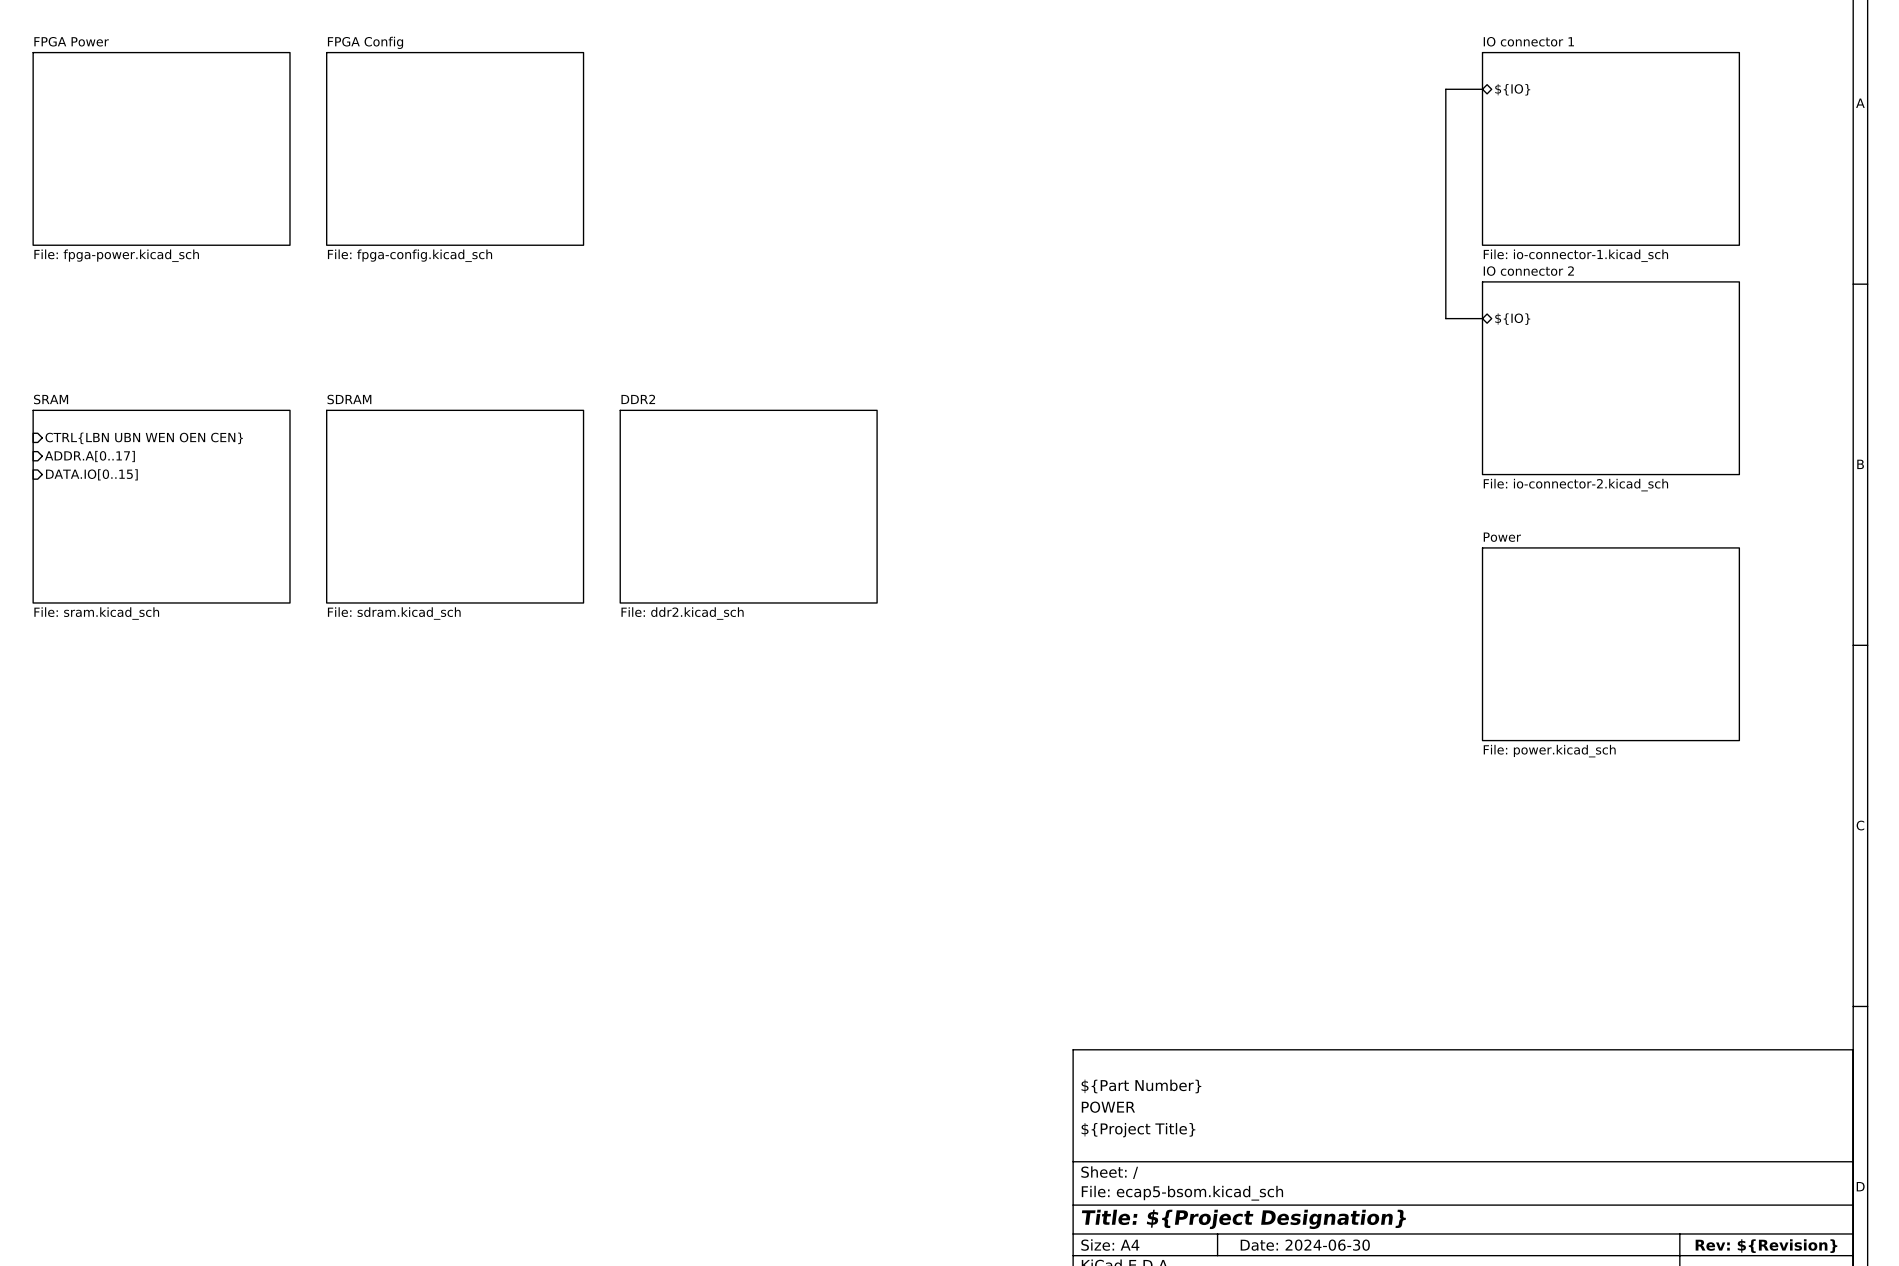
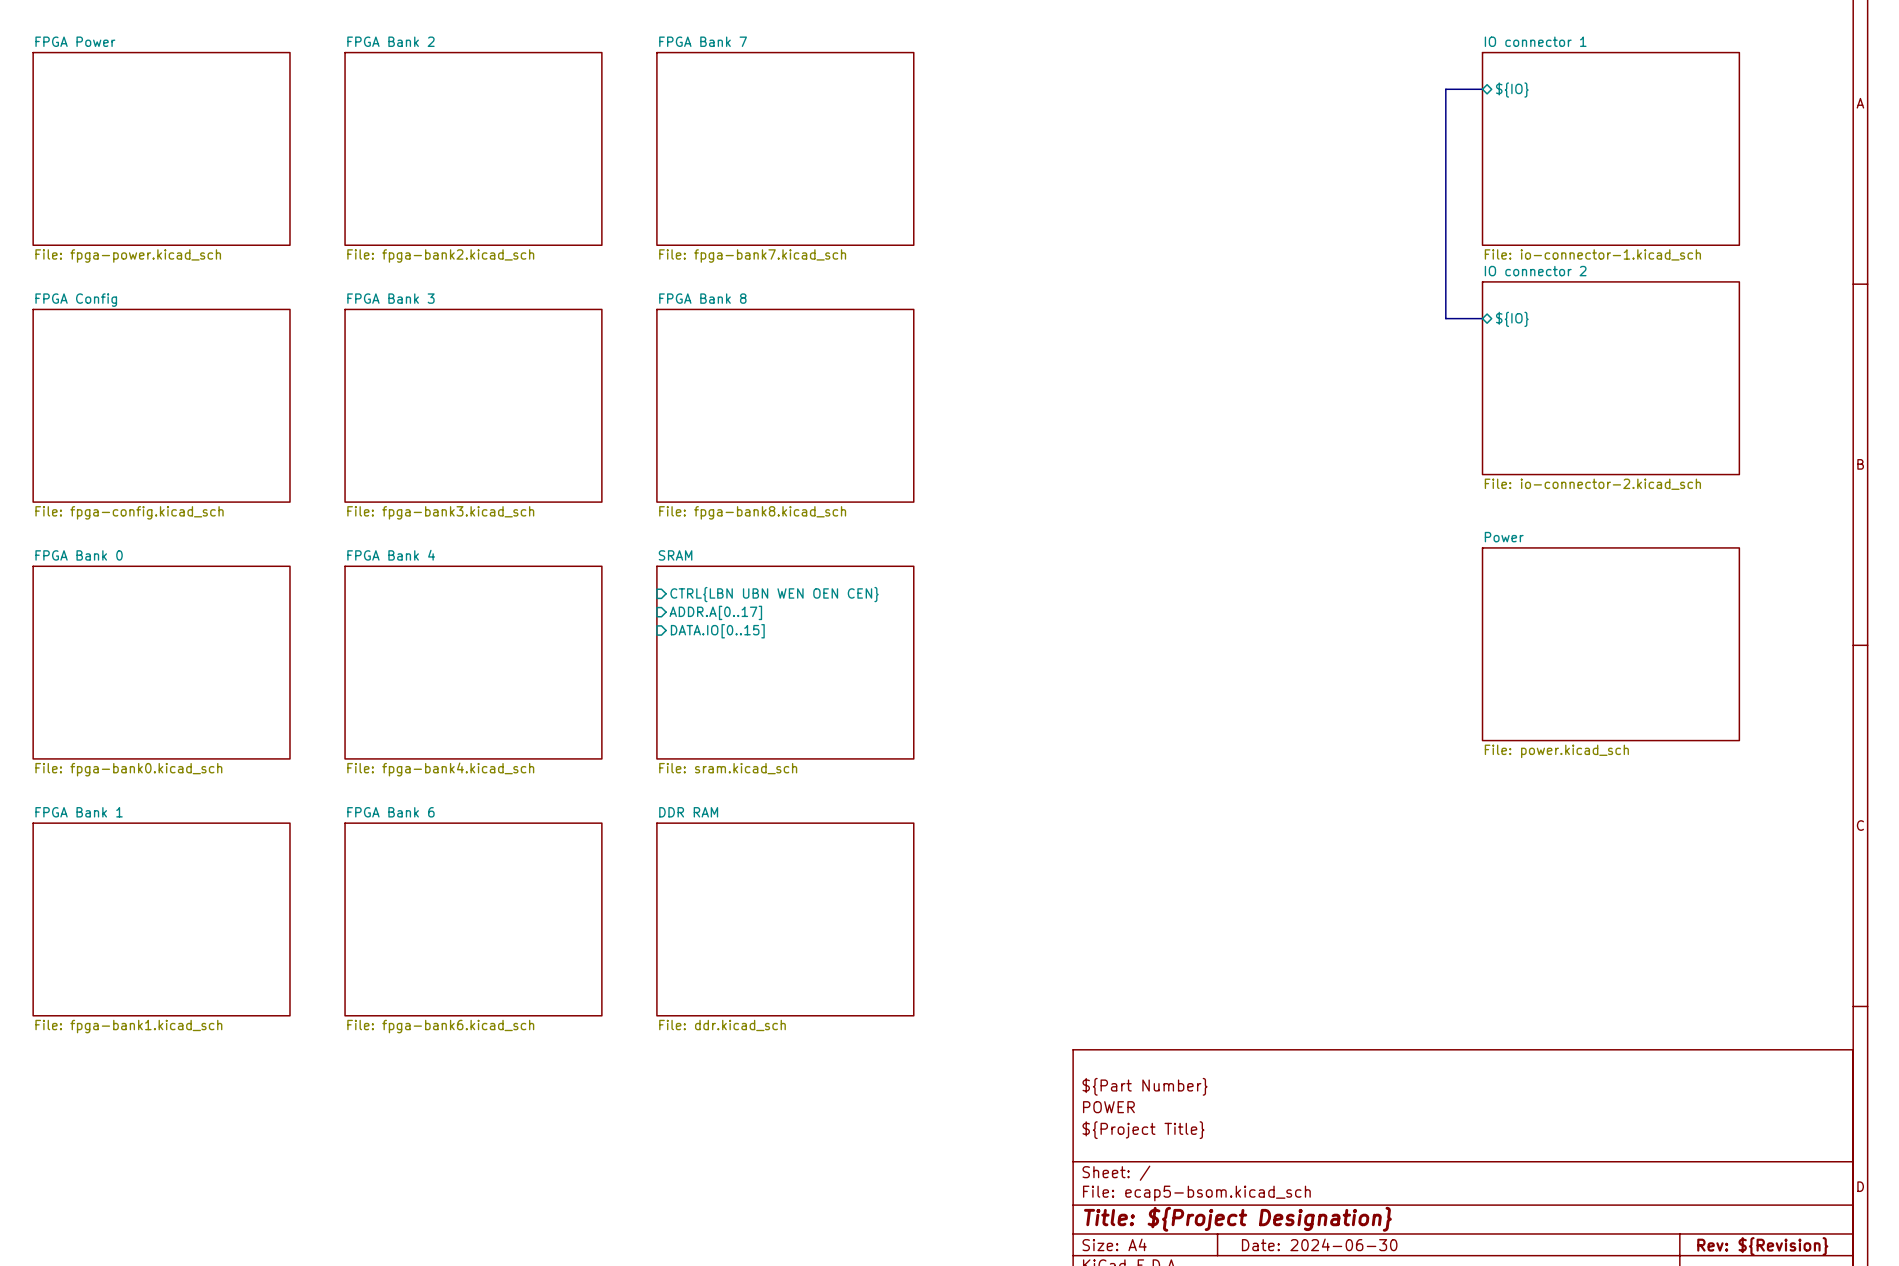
sheet FPGA Config: File: fpga-config.kicad_sch (455, 148) -> none
sheet FPGA Bank 2: none -> File: fpga-bank2.kicad_sch (473, 148)
sheet FPGA Bank 7: none -> File: fpga-bank7.kicad_sch (785, 148)
sheet FPGA Config: none -> File: fpga-config.kicad_sch (161, 405)
sheet FPGA Bank 3: none -> File: fpga-bank3.kicad_sch (473, 405)
sheet FPGA Bank 8: none -> File: fpga-bank8.kicad_sch (785, 405)
sheet pin: CTRL{LBN UBN WEN OEN CEN} (144, 438) -> none
sheet pin: ADDR.A[0..17] (89, 456) -> none
sheet pin: DATA.IO[0..15] (91, 474) -> none
sheet SRAM: File: sram.kicad_sch (161, 506) -> none
sheet SDRAM: File: sdram.kicad_sch (455, 506) -> none
sheet DDR2: File: ddr2.kicad_sch (748, 506) -> none
sheet pin: none -> CTRL{LBN UBN WEN OEN CEN} (774, 594)
sheet pin: none -> ADDR.A[0..17] (715, 612)
sheet pin: none -> DATA.IO[0..15] (717, 631)
sheet FPGA Bank 0: none -> File: fpga-bank0.kicad_sch (161, 662)
sheet FPGA Bank 4: none -> File: fpga-bank4.kicad_sch (473, 662)
sheet SRAM: none -> File: sram.kicad_sch (785, 662)
sheet FPGA Bank 1: none -> File: fpga-bank1.kicad_sch (161, 919)
sheet FPGA Bank 6: none -> File: fpga-bank6.kicad_sch (473, 919)
sheet DDR RAM: none -> File: ddr.kicad_sch (785, 919)

